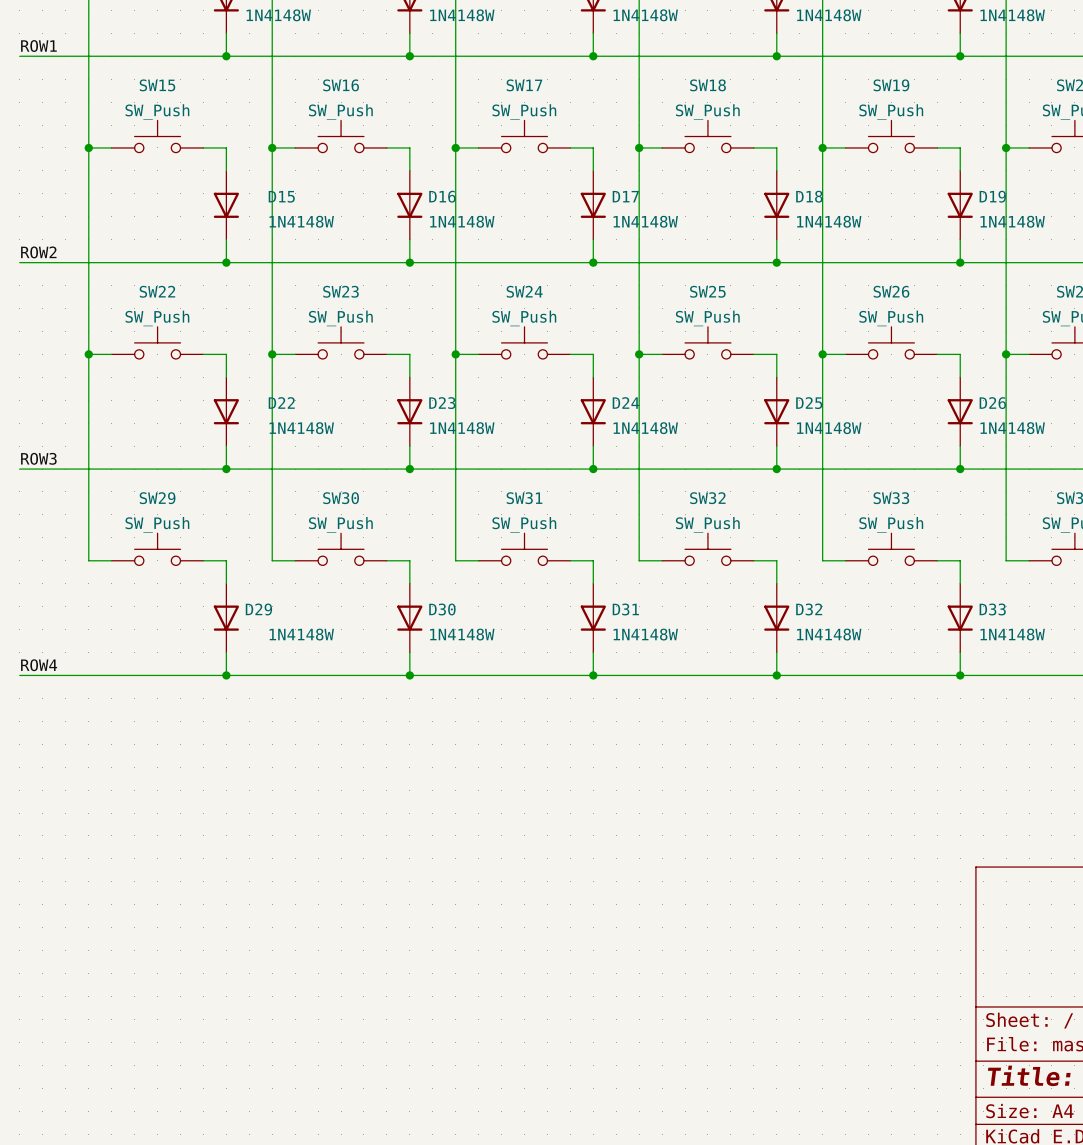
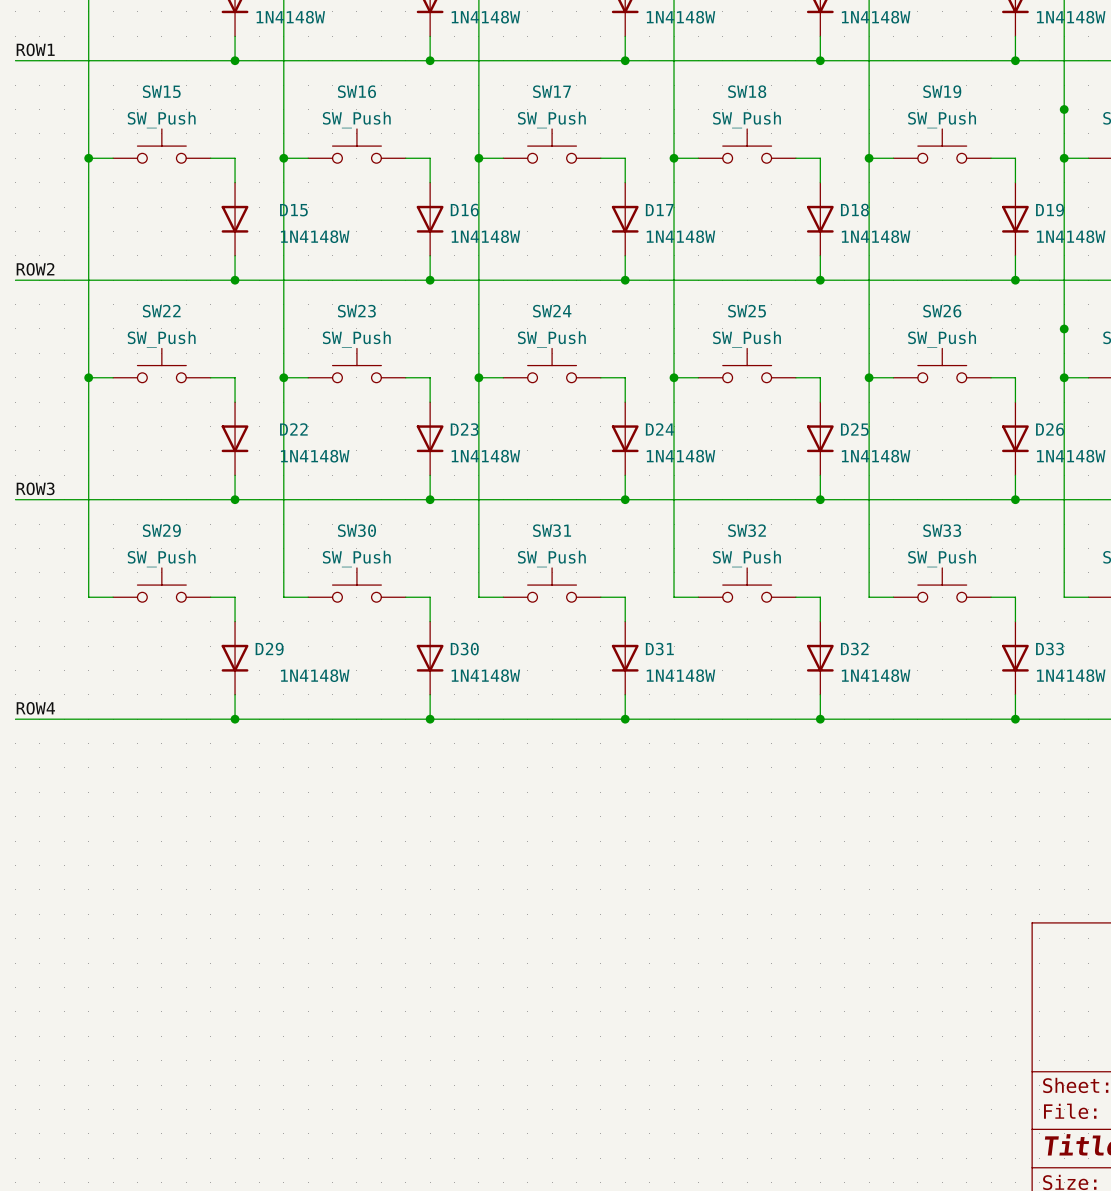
junction: none -> (1064, 109)
junction: none -> (1064, 328)

